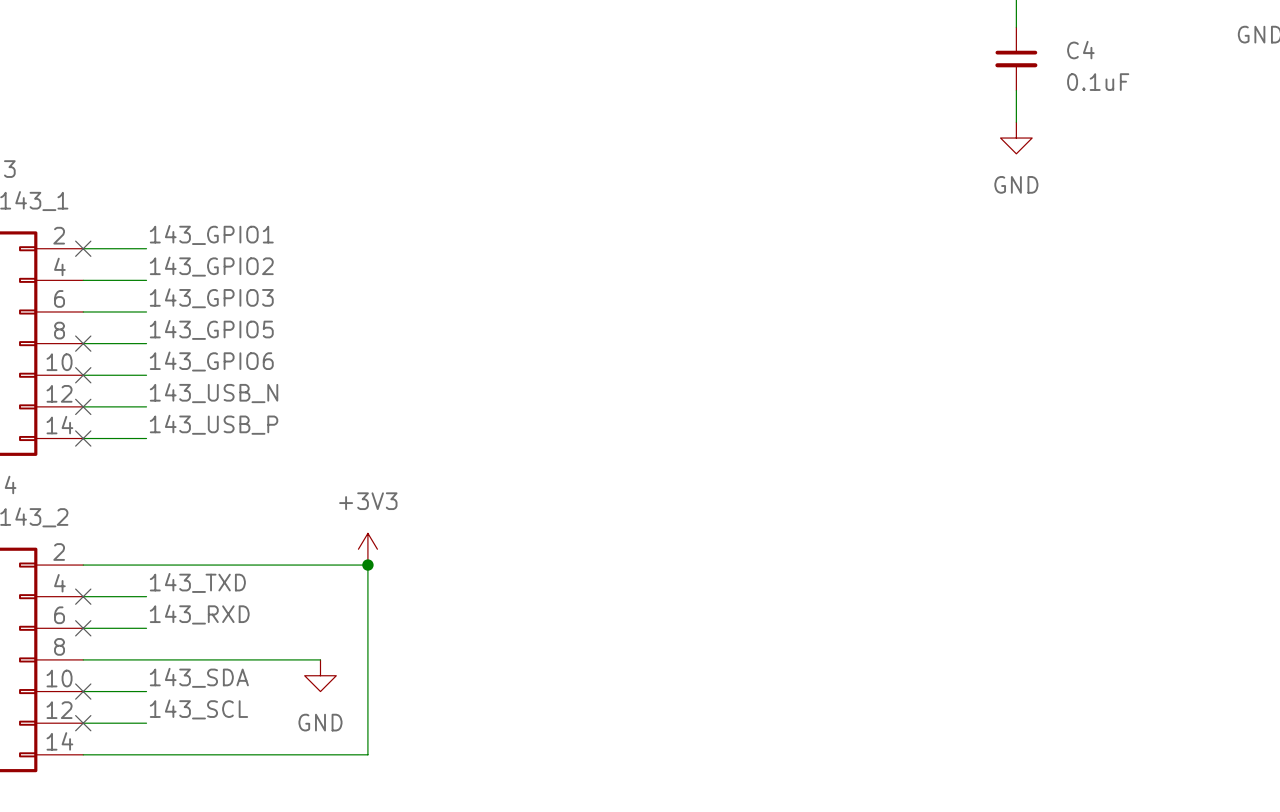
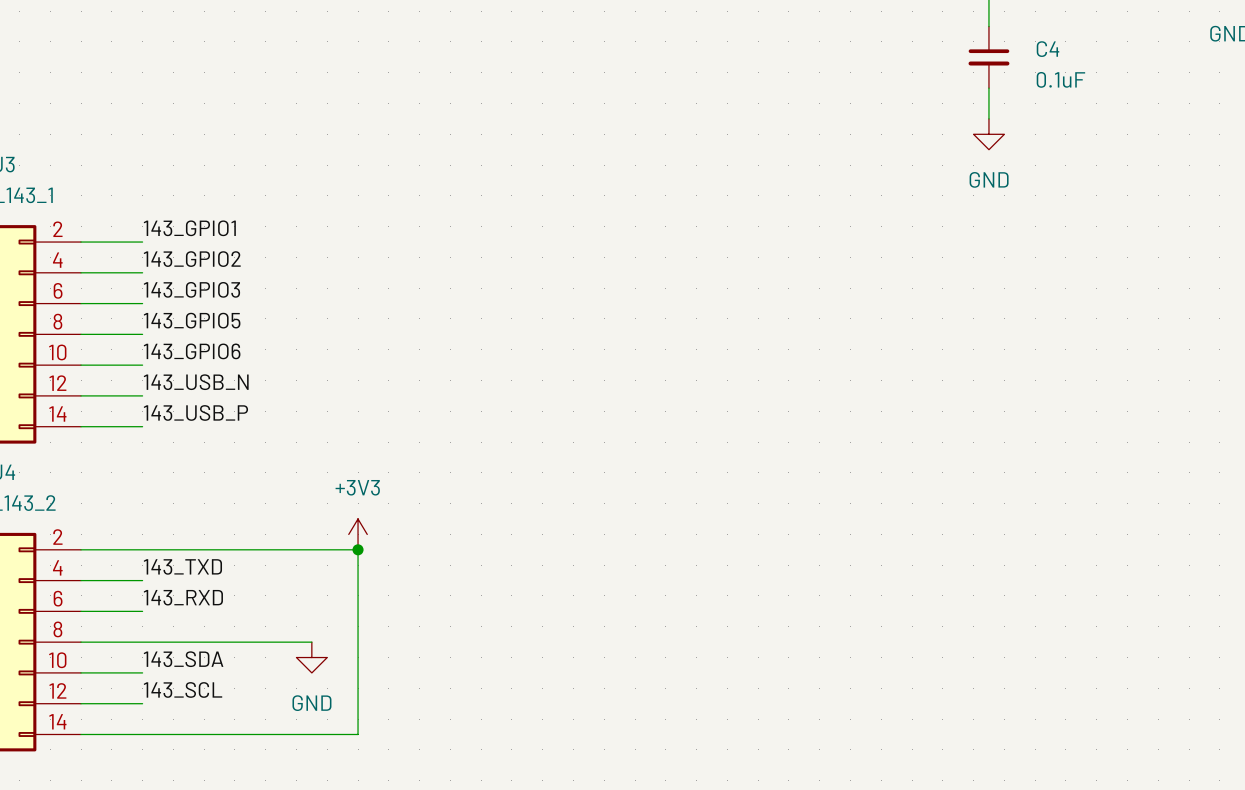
no-connect mark: (83, 248) -> none
no-connect mark: (83, 343) -> none
no-connect mark: (83, 375) -> none
no-connect mark: (83, 406) -> none
no-connect mark: (83, 438) -> none
no-connect mark: (83, 596) -> none
no-connect mark: (83, 628) -> none
no-connect mark: (83, 691) -> none
no-connect mark: (83, 723) -> none

